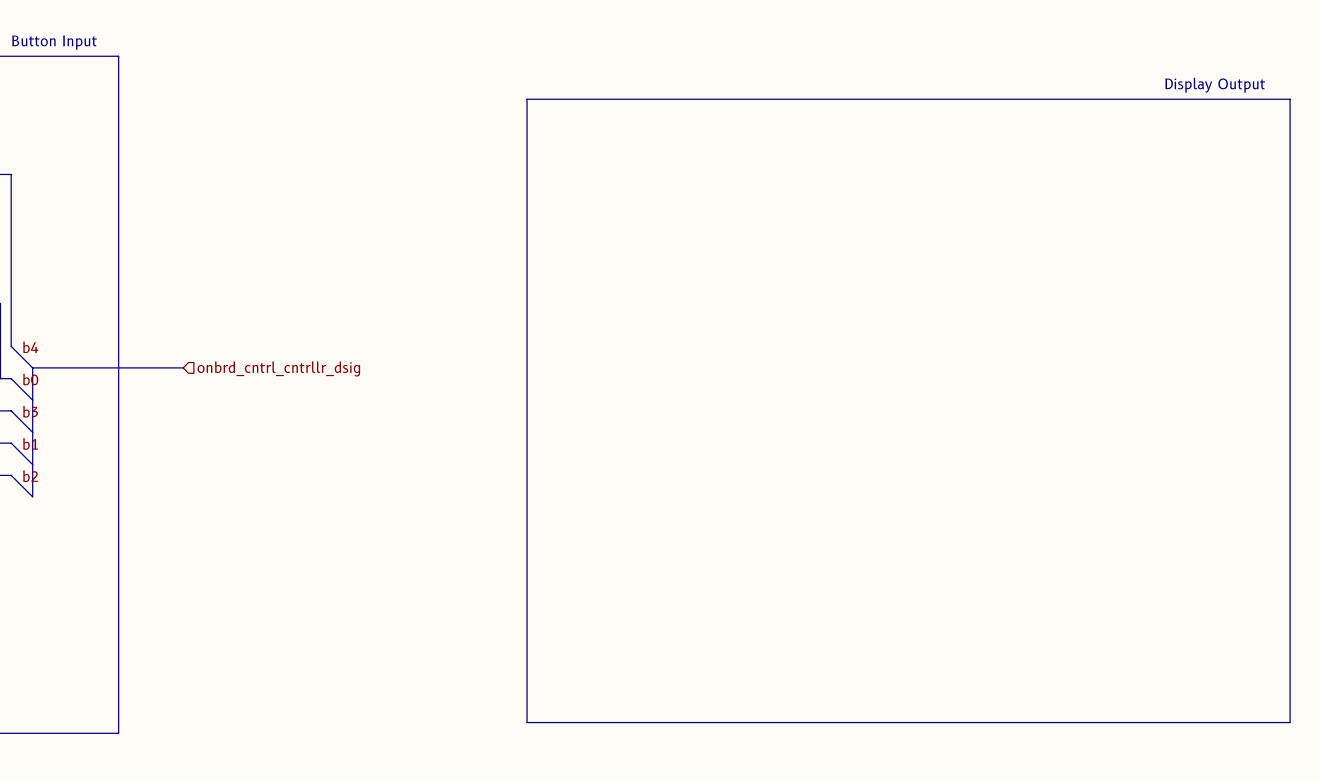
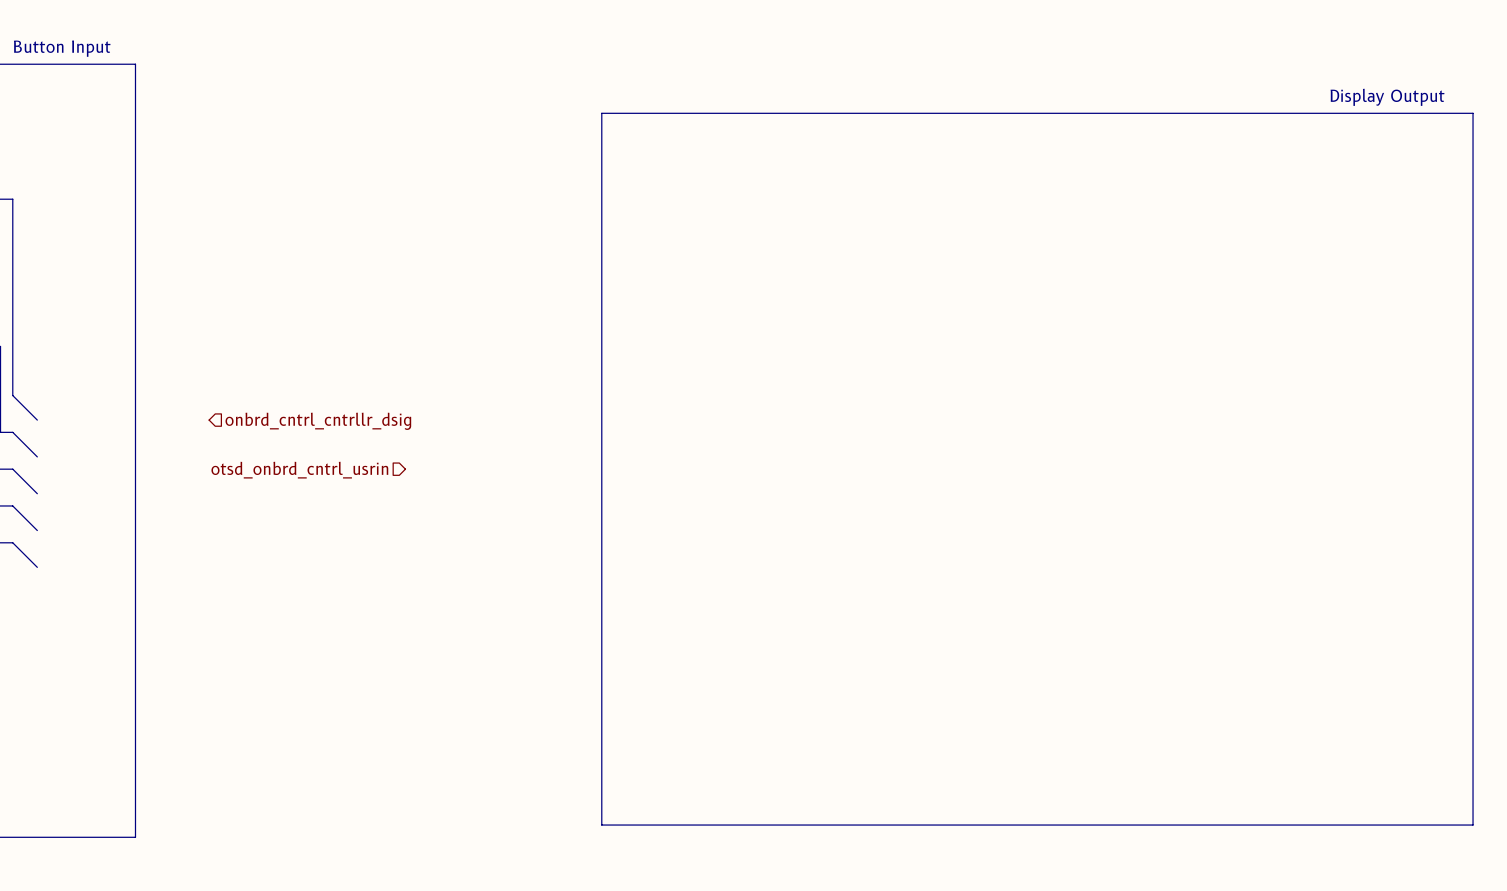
label: b4 (30, 347) -> none
bus: (183, 367) (32, 367) (32, 496) -> none
label: b0 (30, 379) -> none
label: b3 (30, 411) -> none
hierarchical label: none -> otsd_onbrd_cntrl_usrin (299, 470)
label: b1 (30, 444) -> none
label: b2 (30, 476) -> none

